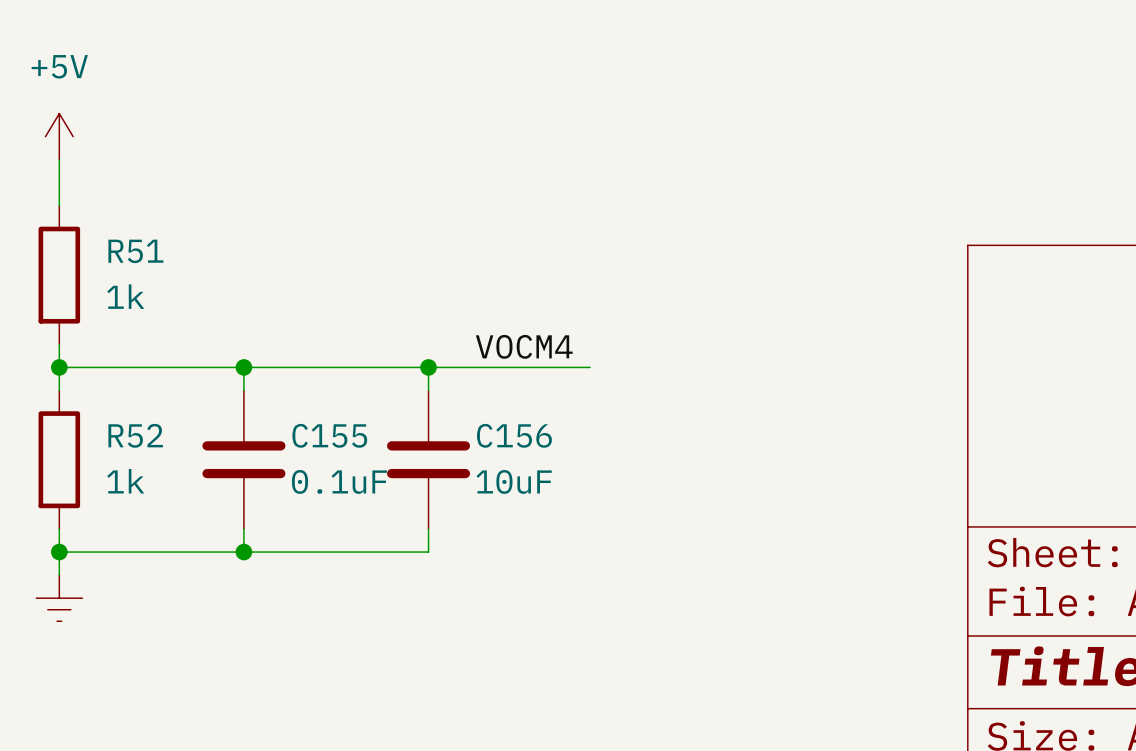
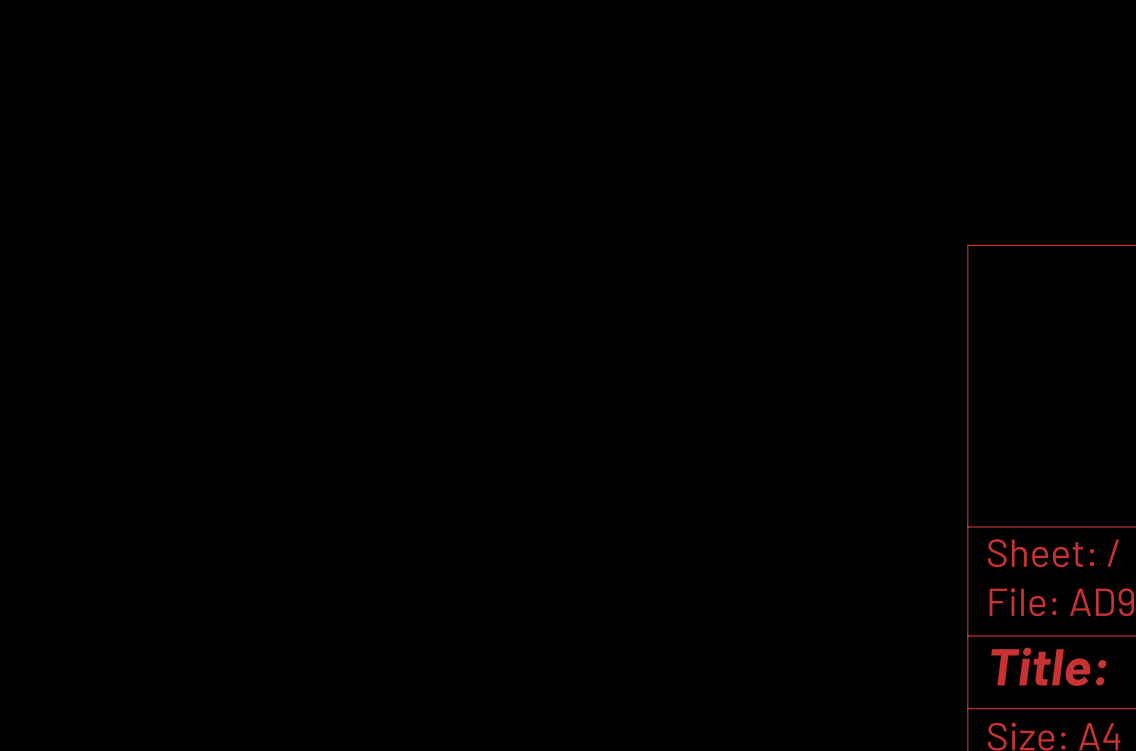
power symbol: +5V (59, 136) -> none
wire: (59, 159) (59, 205) -> none
R51: 1k (59, 275) -> none
wire: (59, 344) (59, 390) -> none
label: VOCM4 (524, 346) -> none
wire: (59, 367) (590, 367) -> none
junction: (59, 367) -> none
wire: (243, 367) (243, 390) -> none
junction: (243, 367) -> none
wire: (428, 367) (428, 390) -> none
junction: (428, 367) -> none
R52: 1k (59, 459) -> none
C155: 0.1uF (243, 459) -> none
C156: 10uF (428, 459) -> none
wire: (59, 528) (59, 575) -> none
wire: (243, 528) (243, 552) -> none
wire: (428, 528) (428, 552) (59, 552) -> none
junction: (59, 552) -> none
junction: (243, 552) -> none
power symbol: (59, 598) -> none

